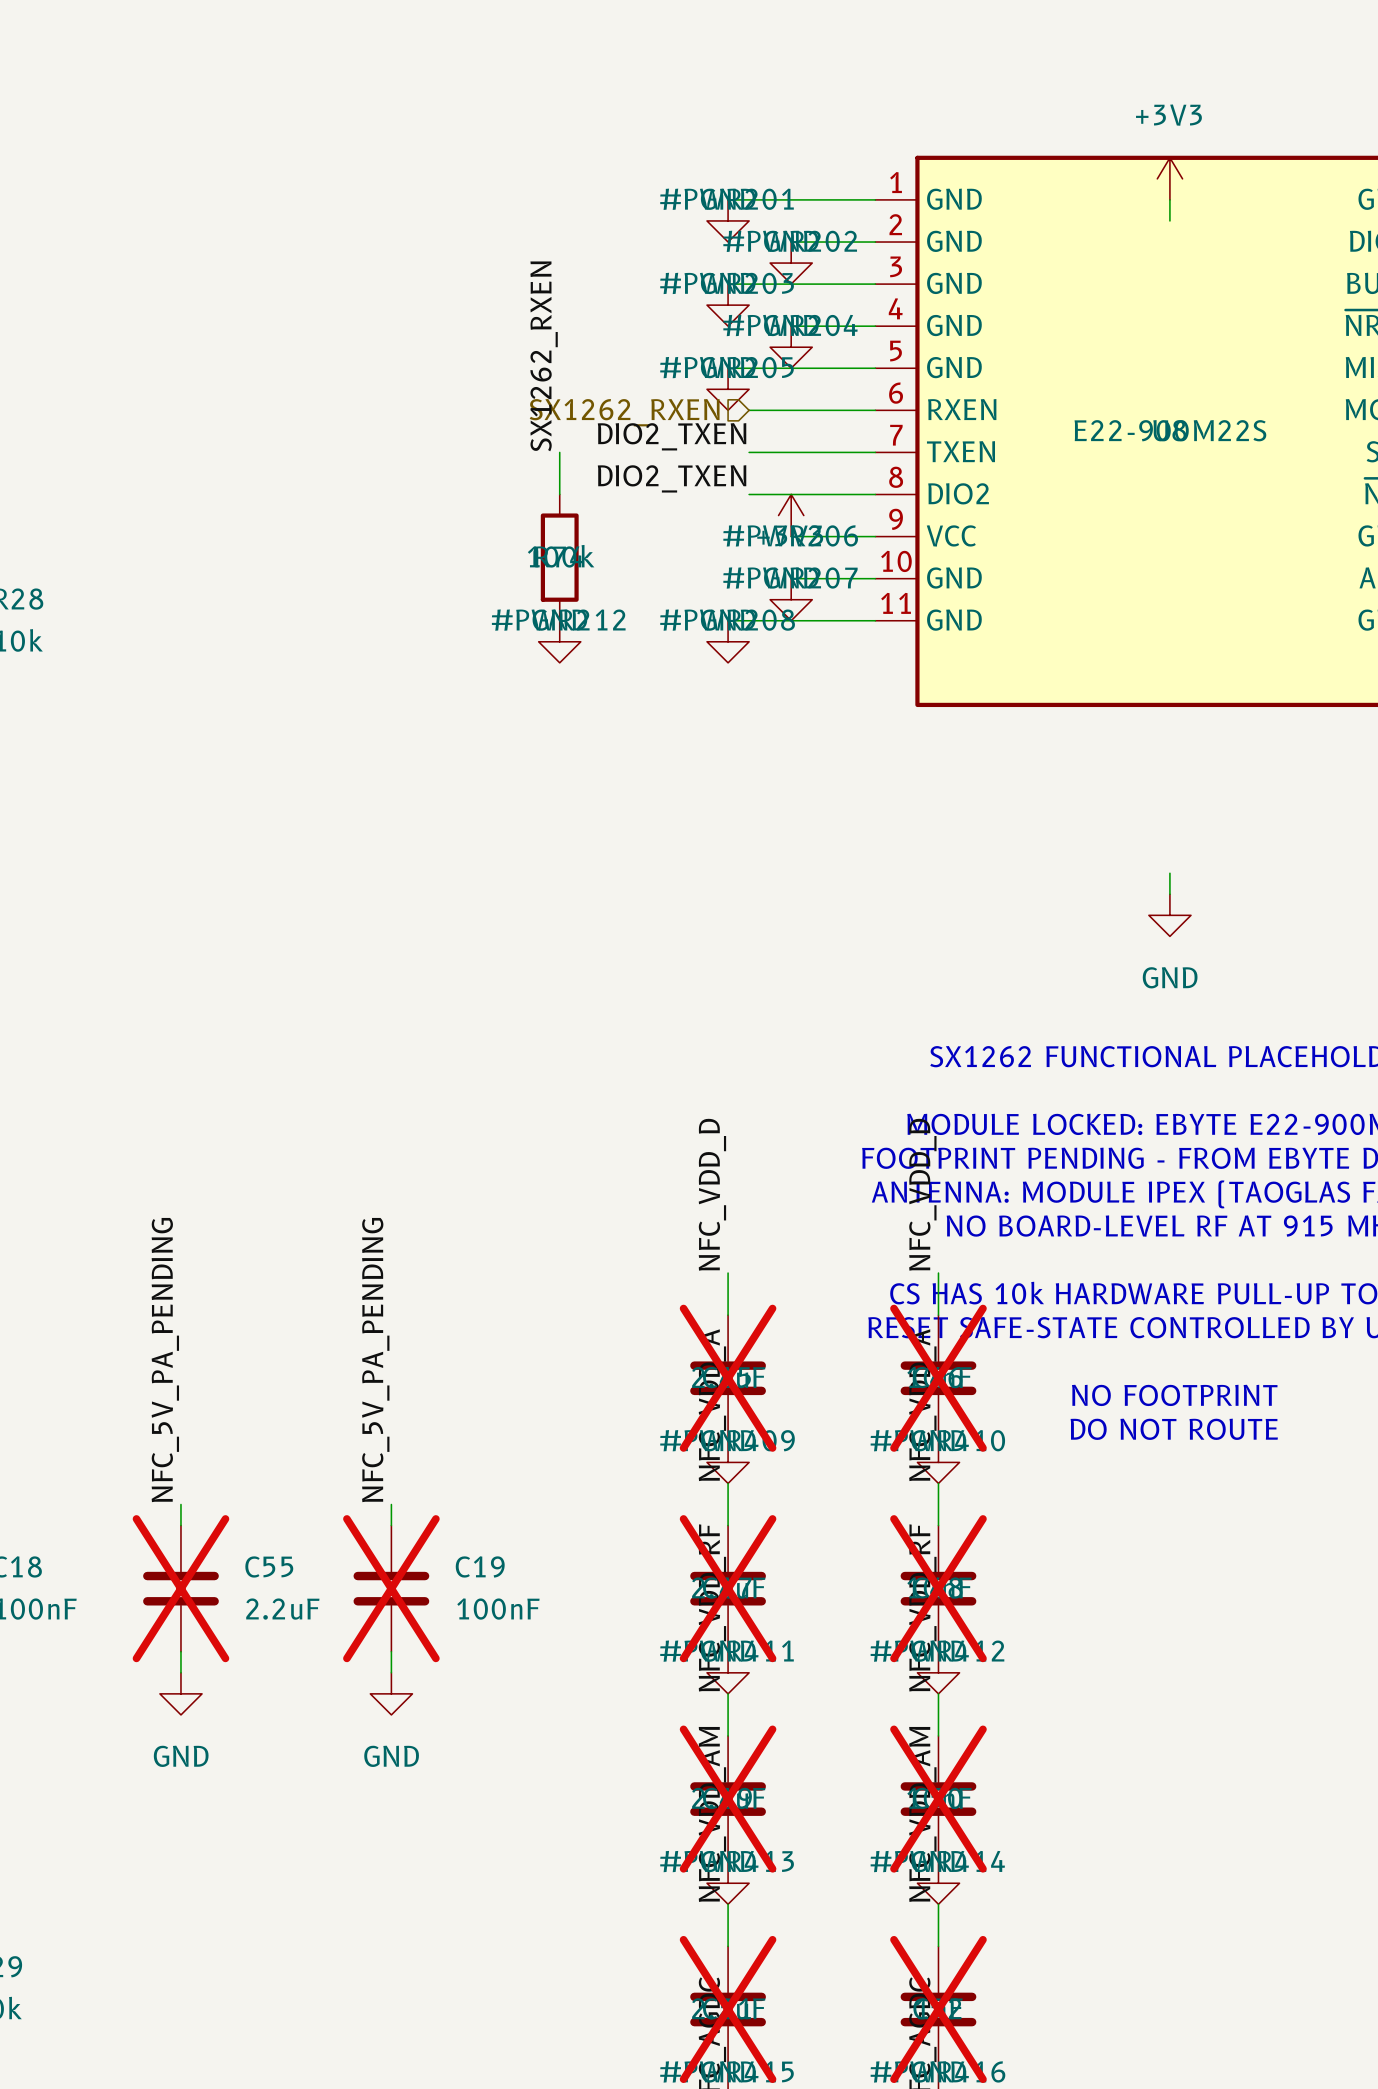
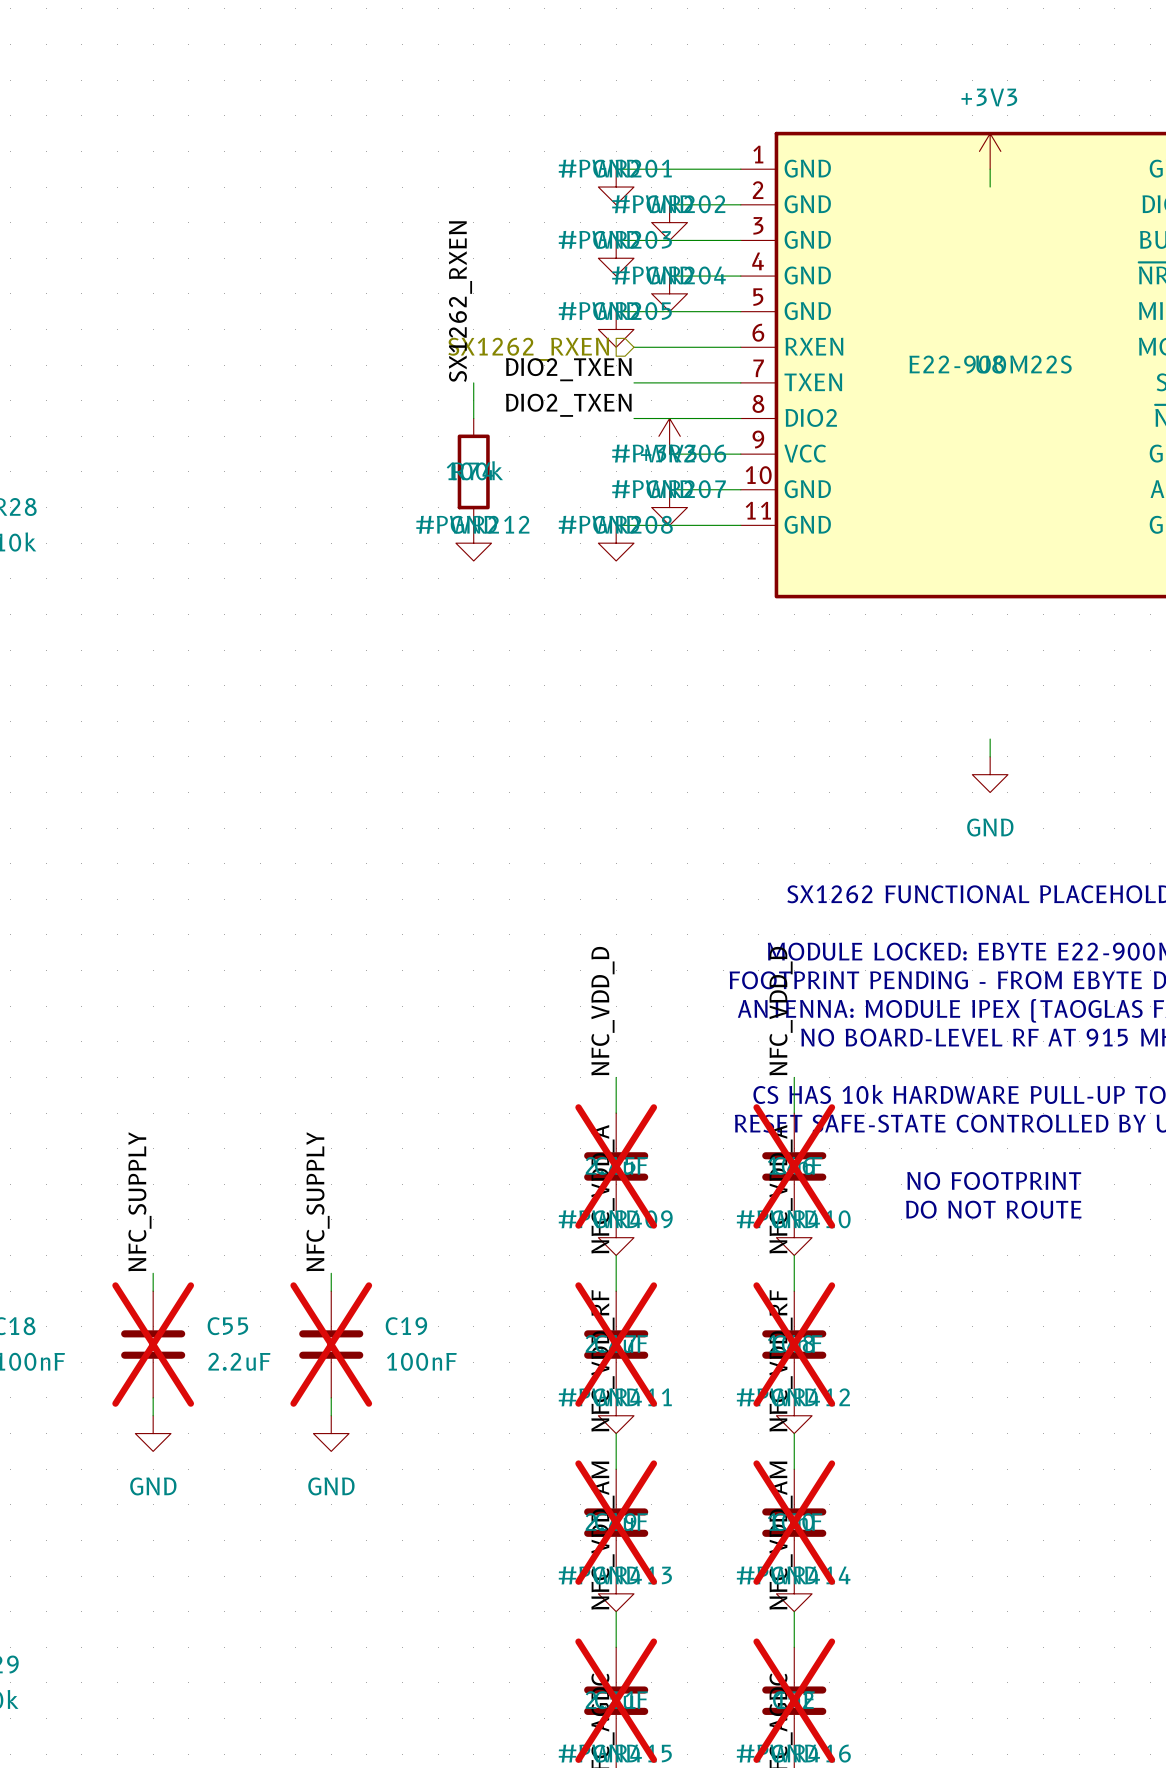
label: NFC_5V_PA_PENDING (165, 1360) -> NFC_SUPPLY (139, 1201)
label: NFC_5V_PA_PENDING (375, 1360) -> NFC_SUPPLY (318, 1201)

